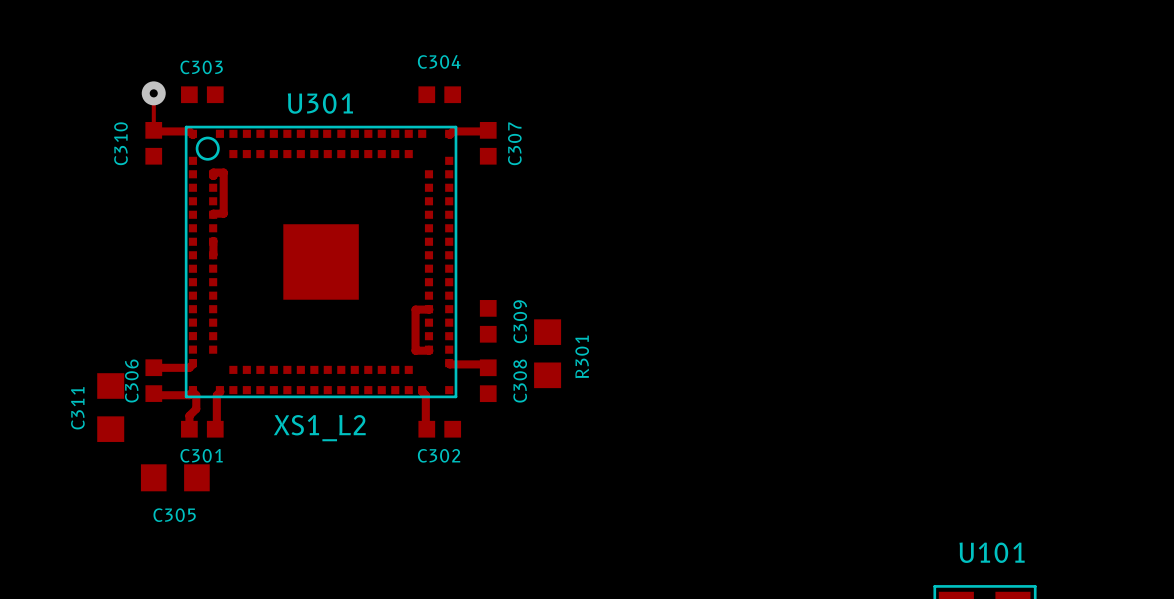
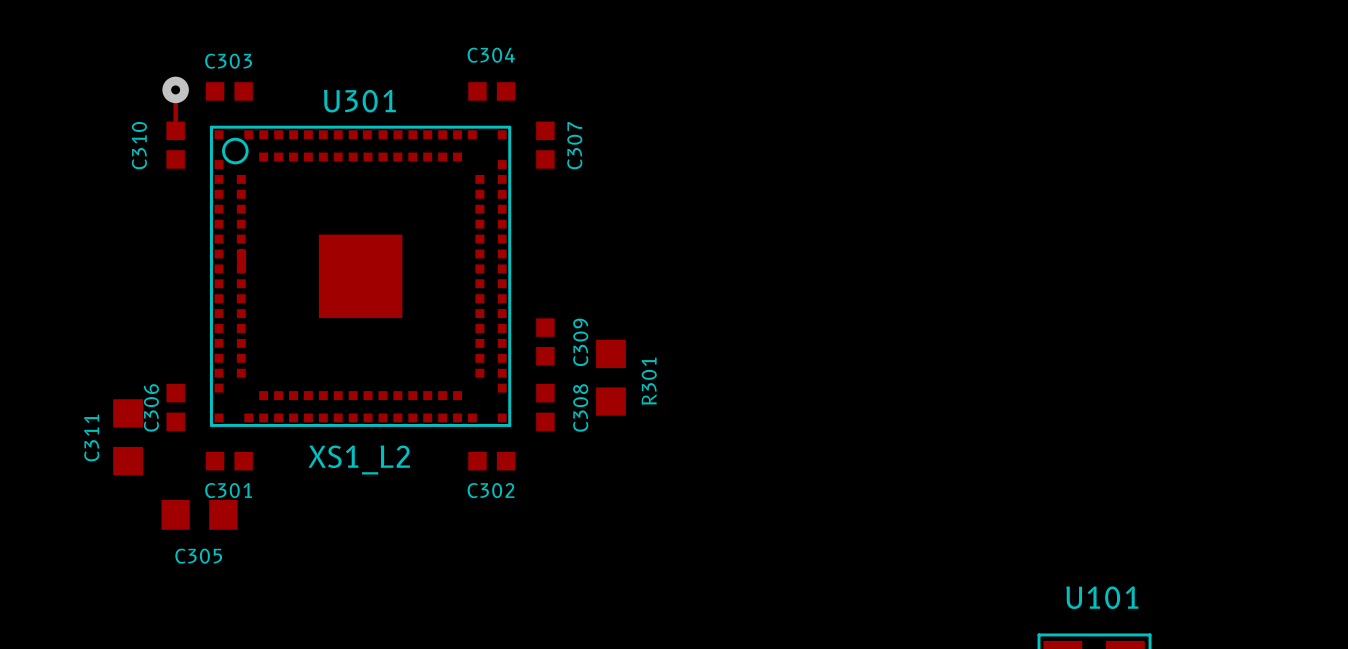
track: (153, 130) (189, 131) (192, 133) -> none
track: (488, 130) (453, 131) (449, 133) -> none
track: (213, 174) (213, 175) (213, 172) (223, 172) (223, 213) (213, 214) -> none
track: (429, 309) (415, 309) (415, 350) (428, 349) -> none
track: (192, 363) (189, 367) (153, 367) -> none
track: (449, 363) (484, 364) (488, 367) -> none
track: (219, 390) (216, 395) (216, 429) (215, 429) -> none
track: (422, 390) (425, 395) (426, 429) -> none
track: (192, 391) (196, 395) (196, 408) (189, 415) (189, 429) -> none
track: (192, 391) (189, 395) (155, 395) (153, 393) -> none

